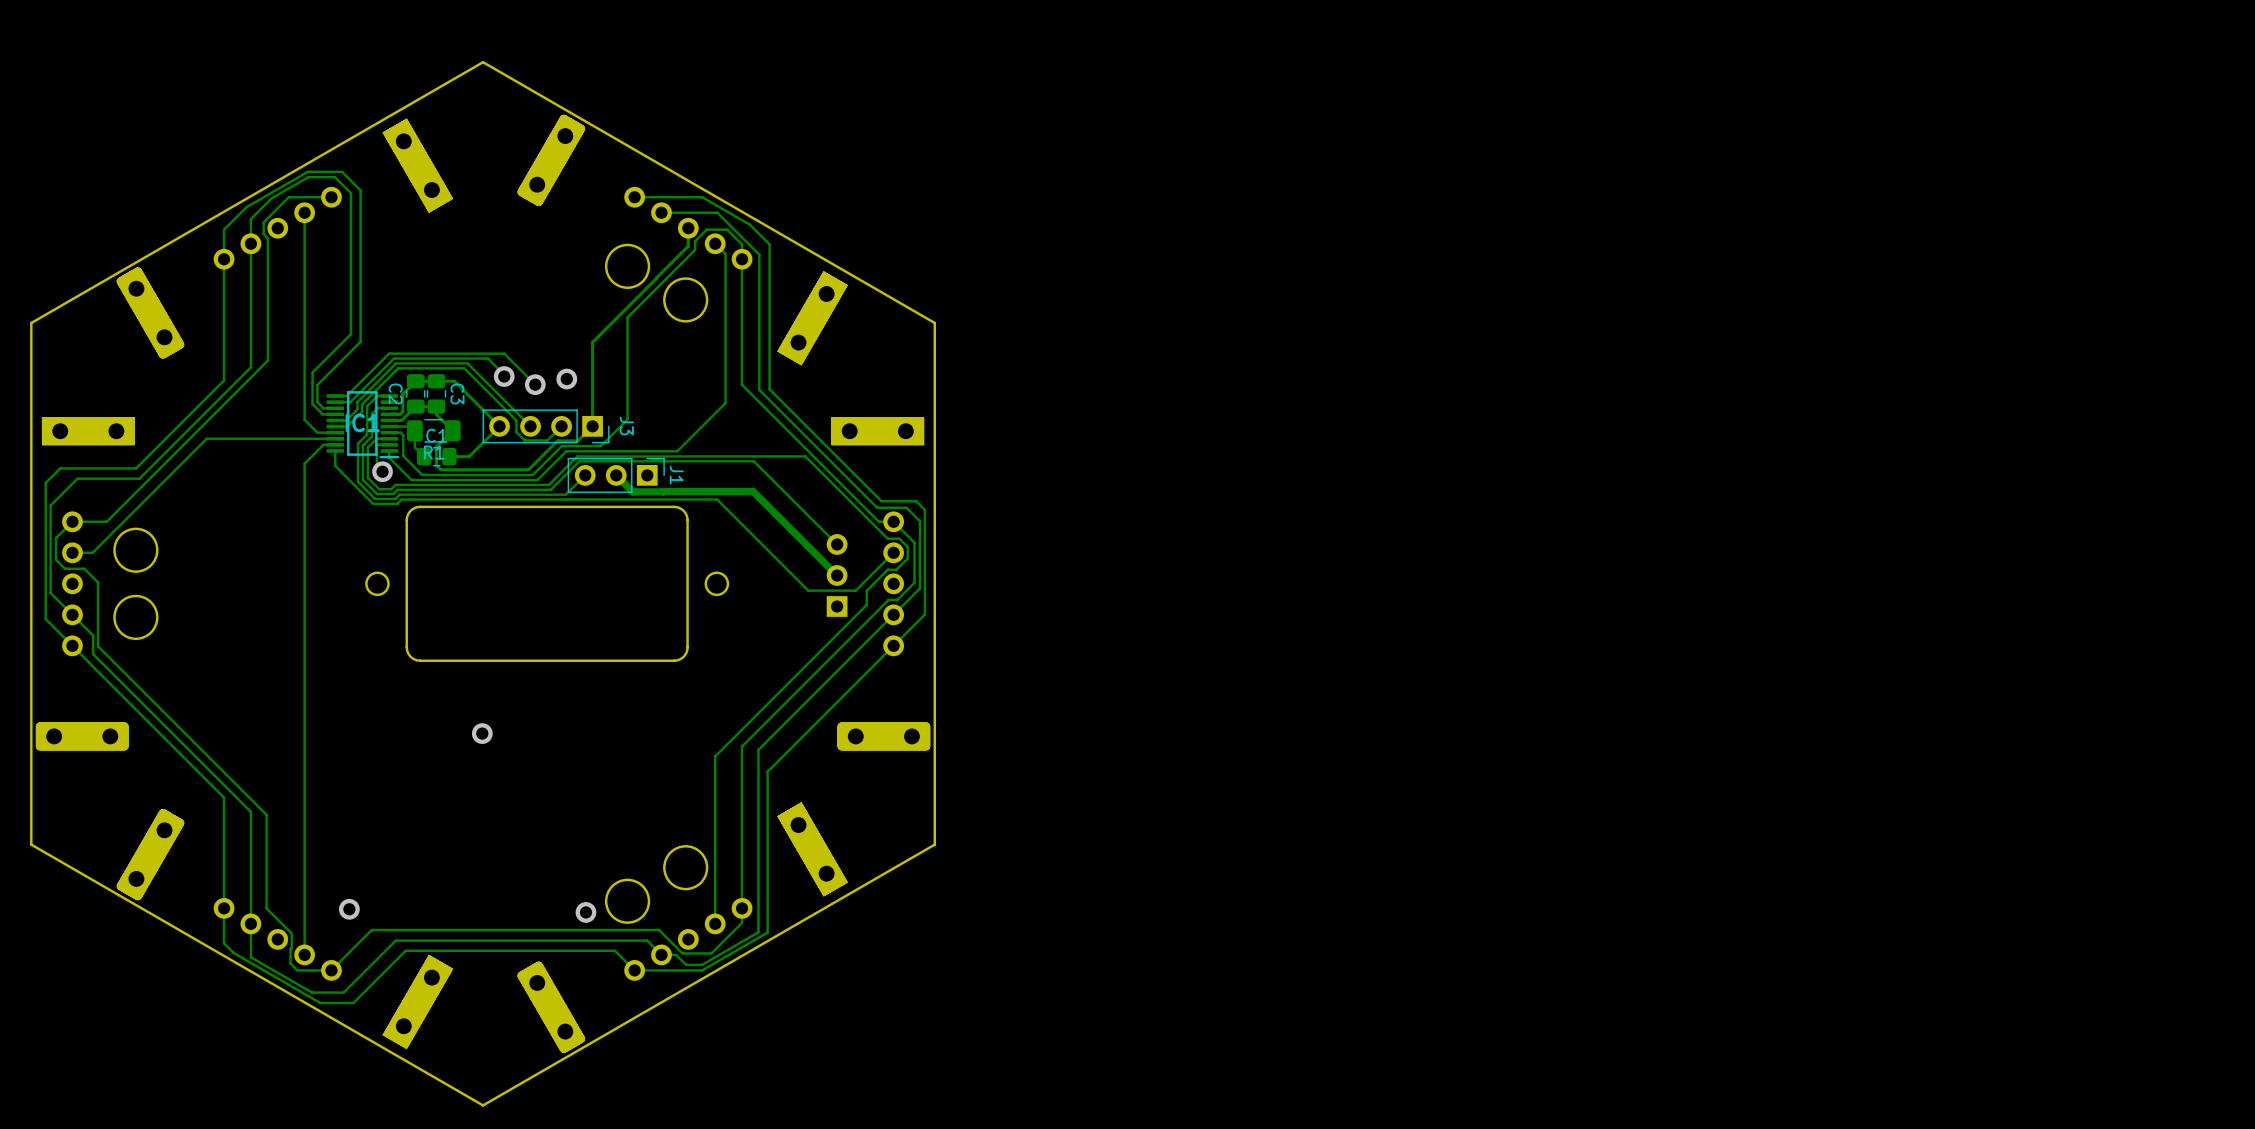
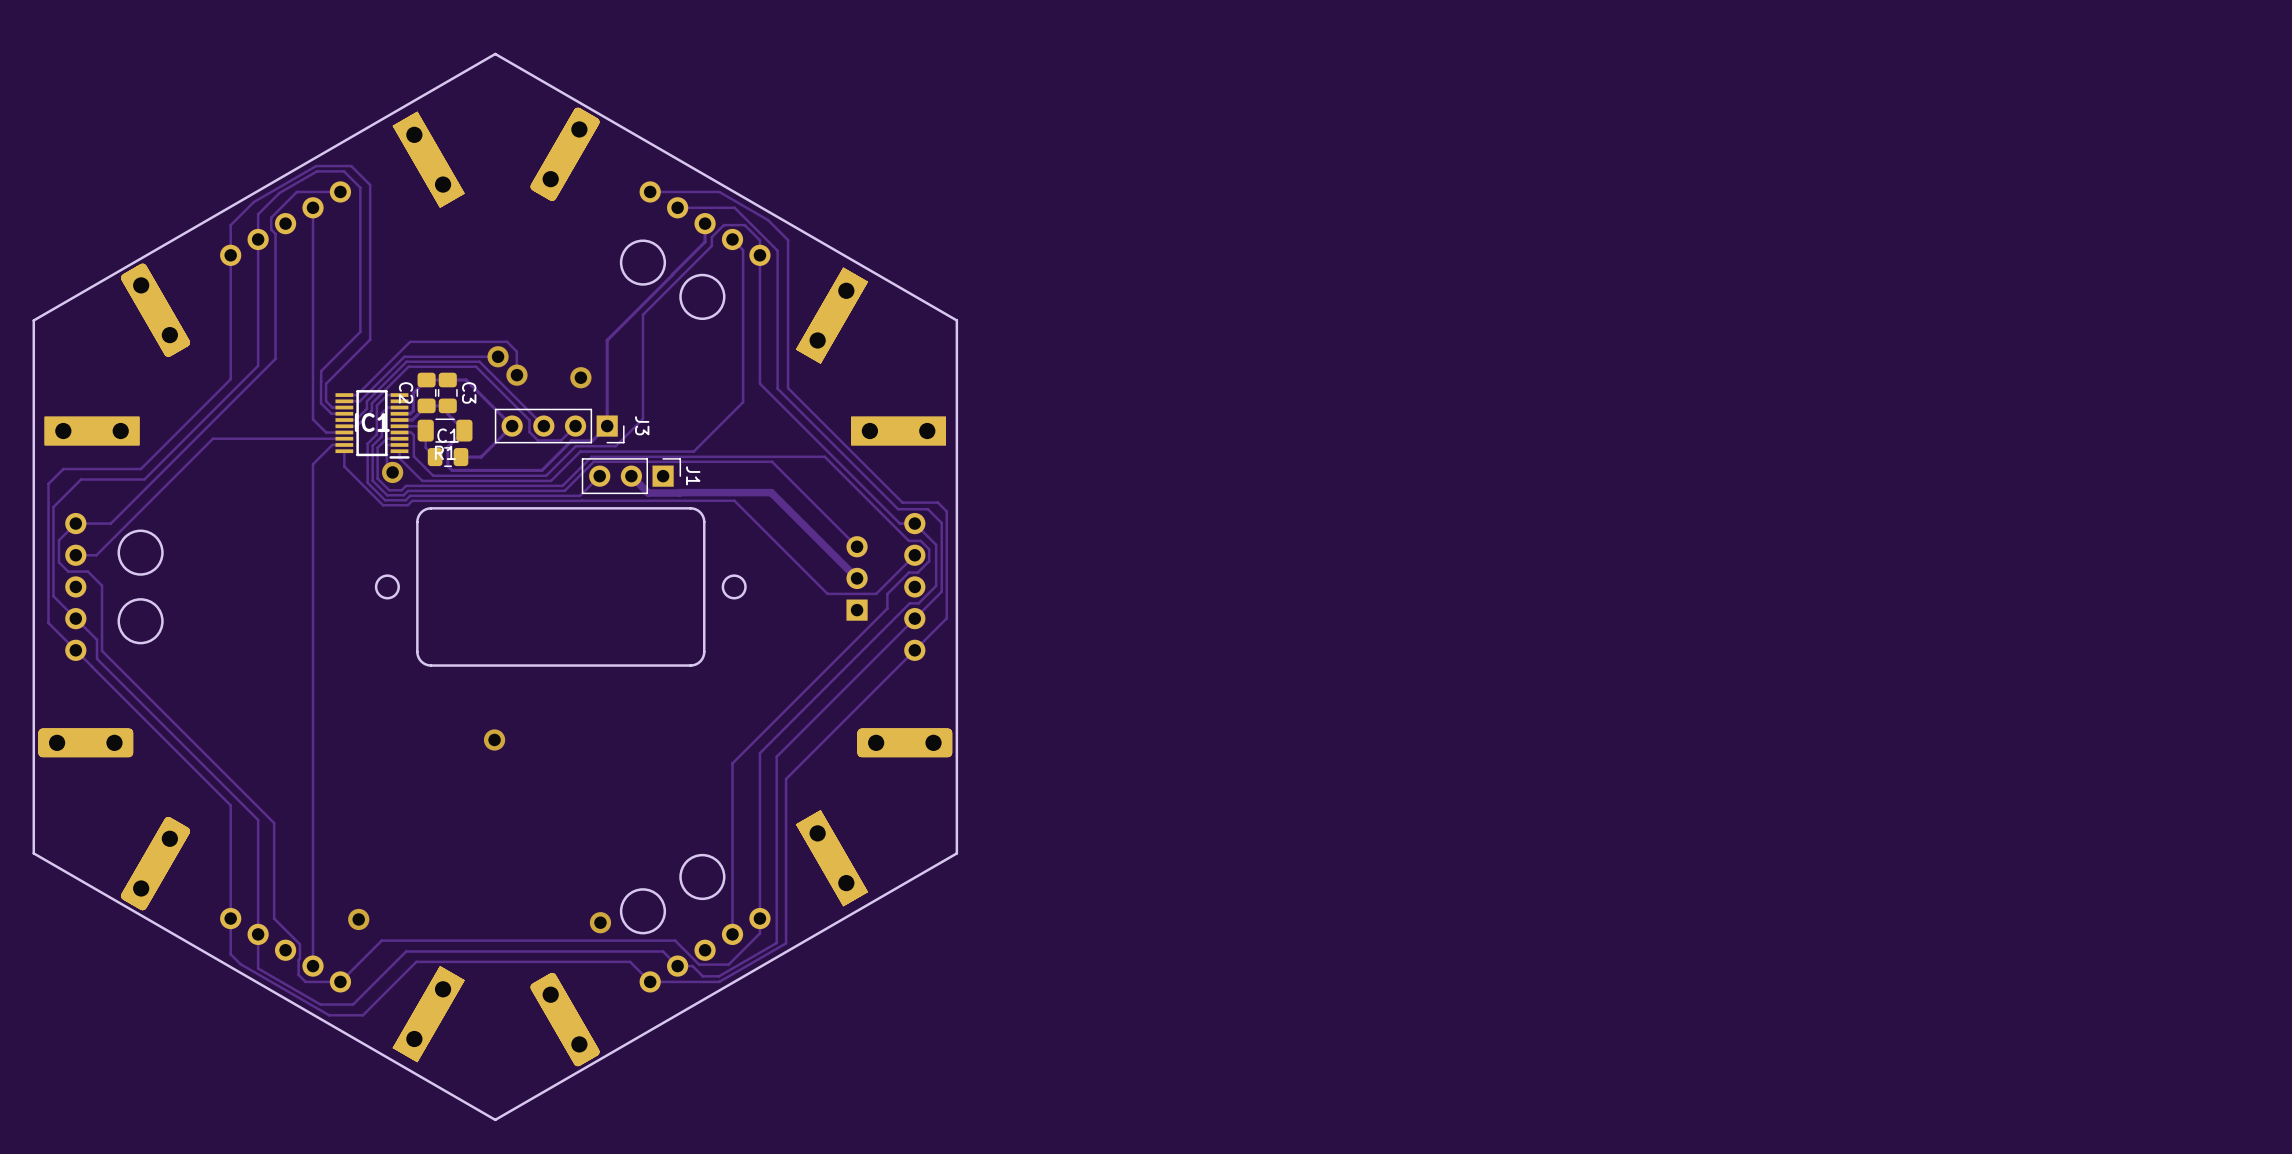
track: (485, 358) (488, 358) (504, 376) -> none
track: (535, 384) (504, 353) (389, 353) (346, 396) -> (516, 374) (516, 351) (507, 341) (410, 341) (356, 395)
via position: (535, 384) -> (498, 356)

